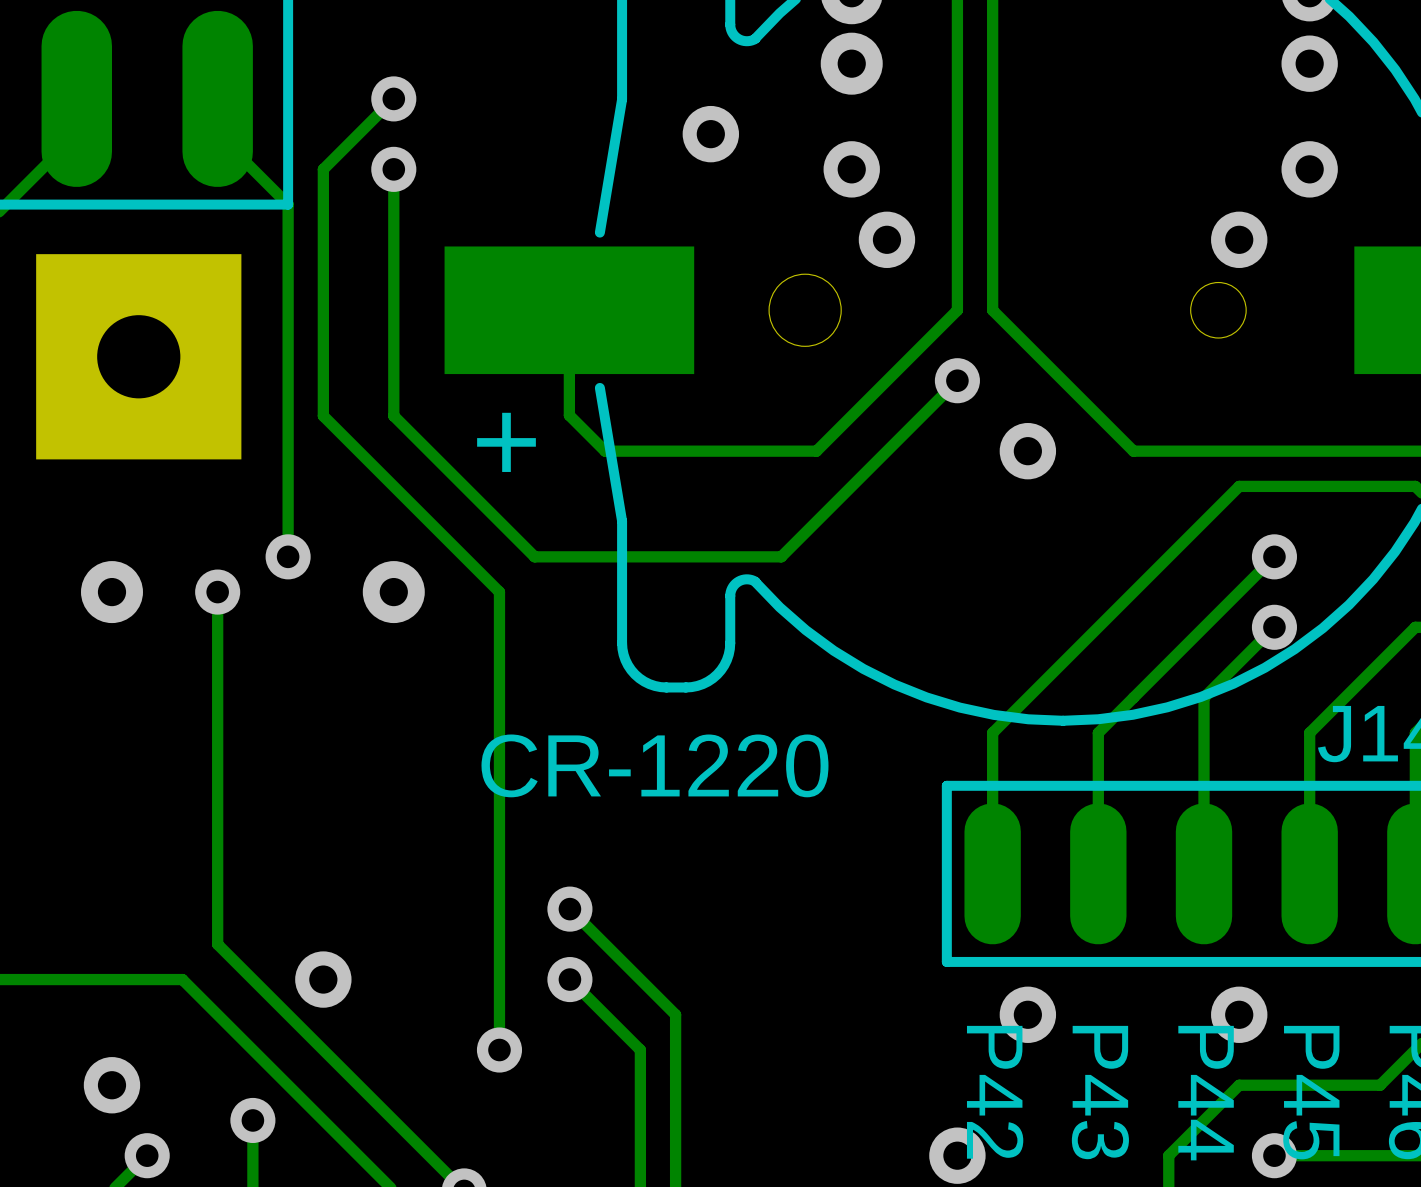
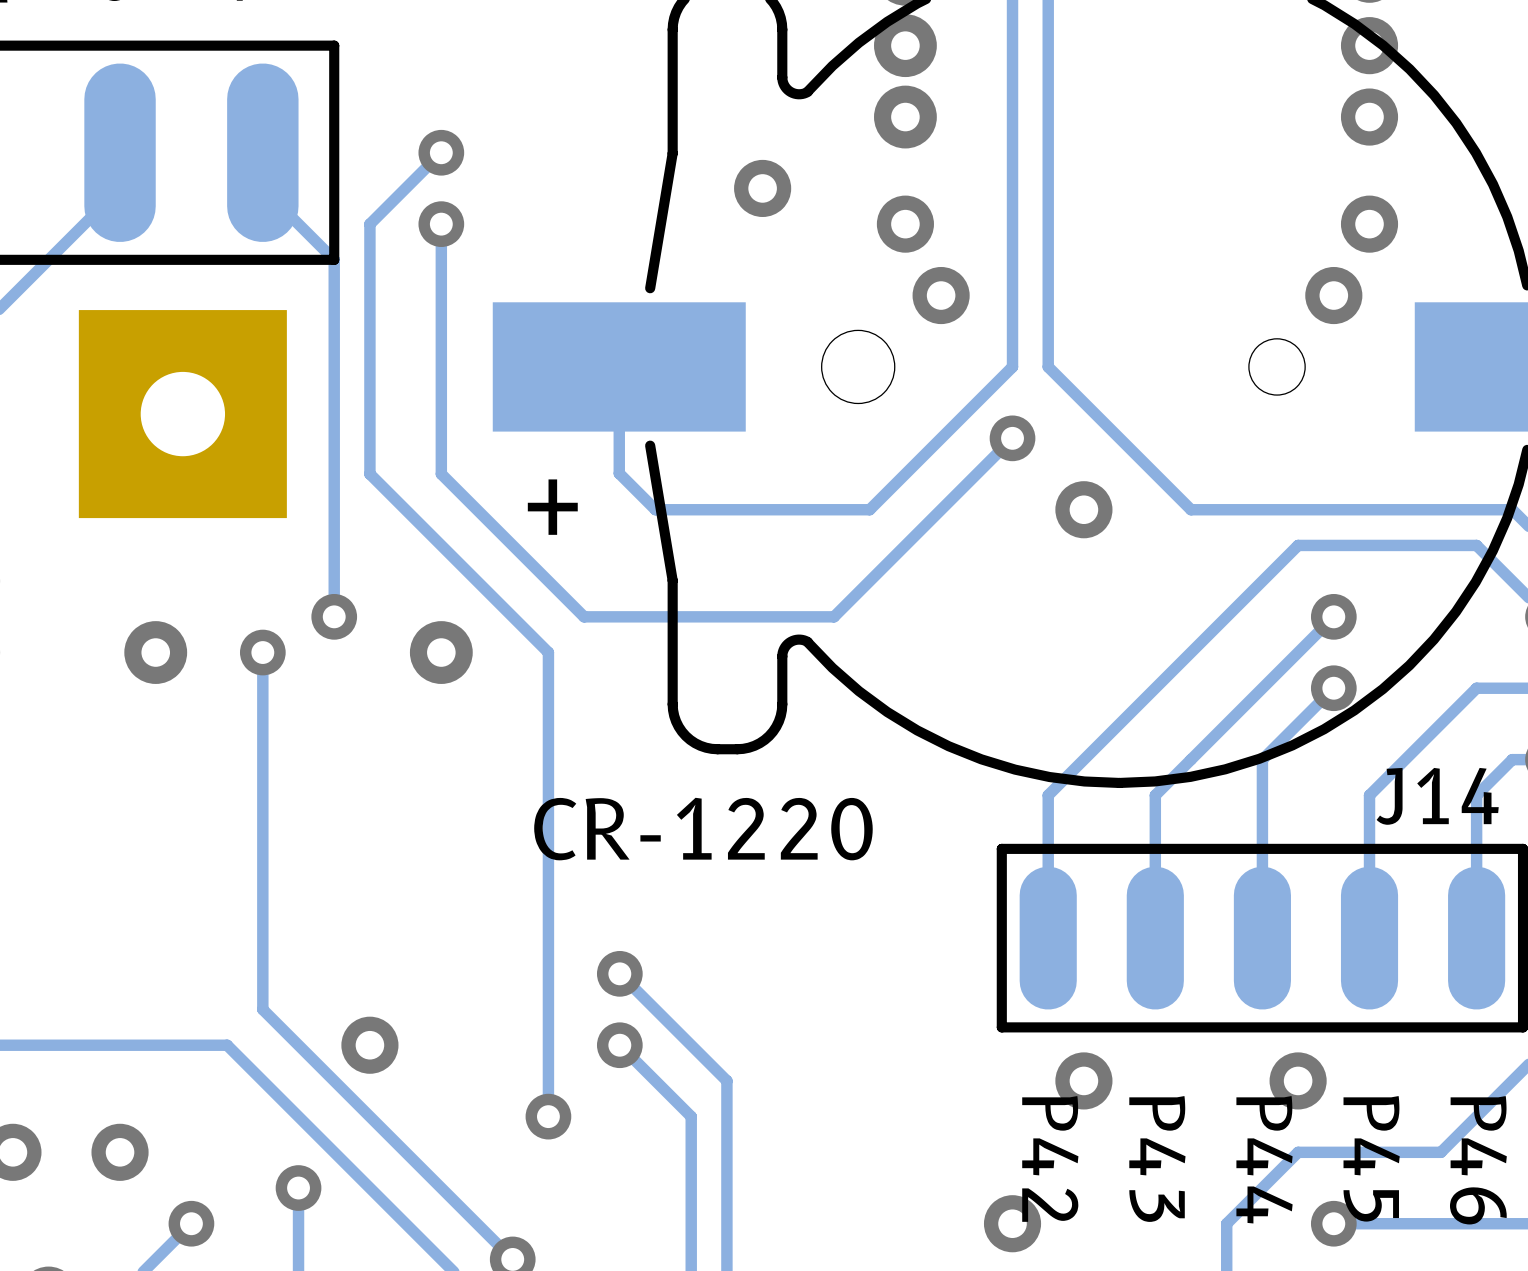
via position: (1239, 239) -> (1333, 295)
via position: (111, 1085) -> (120, 1152)

